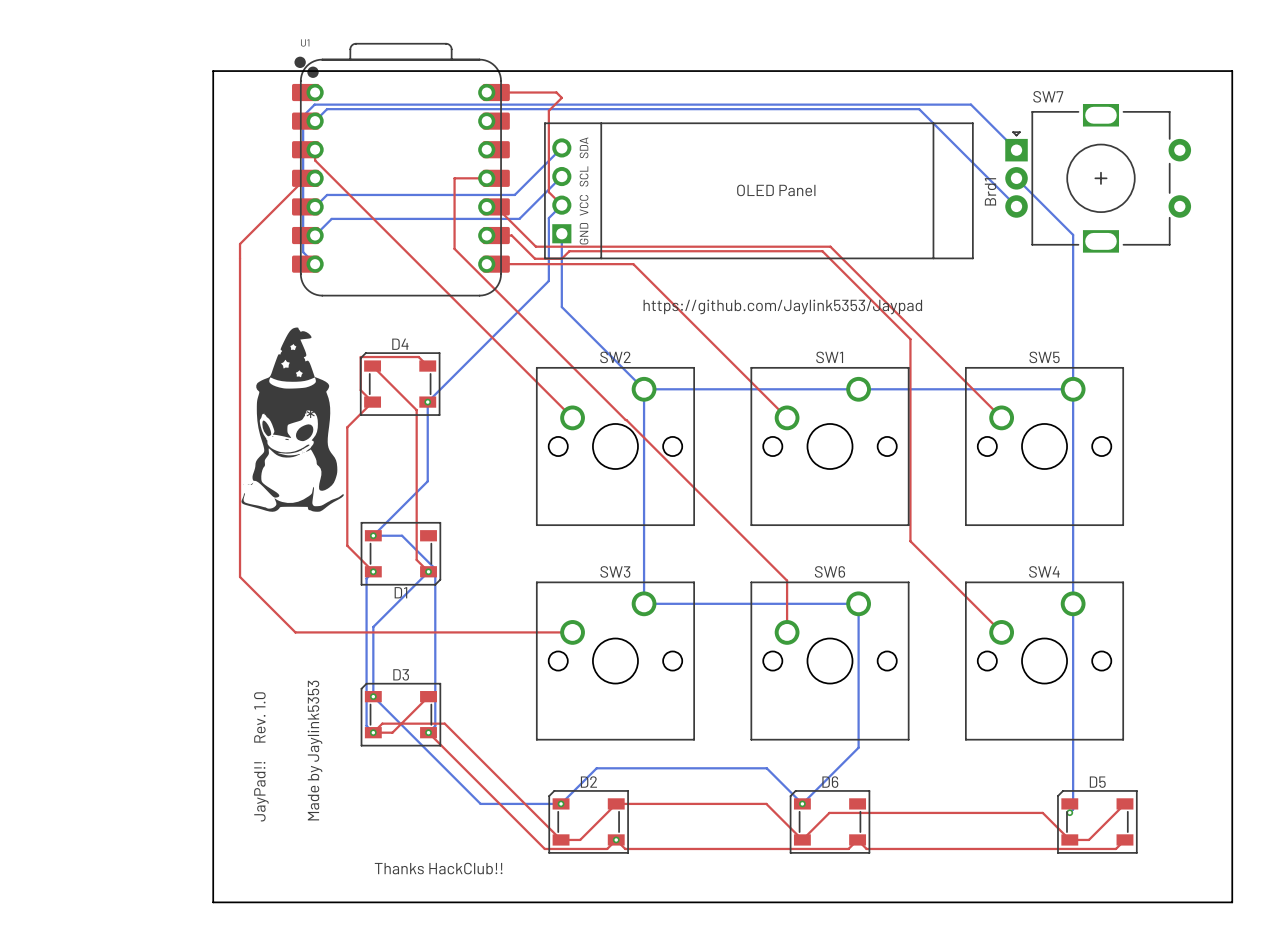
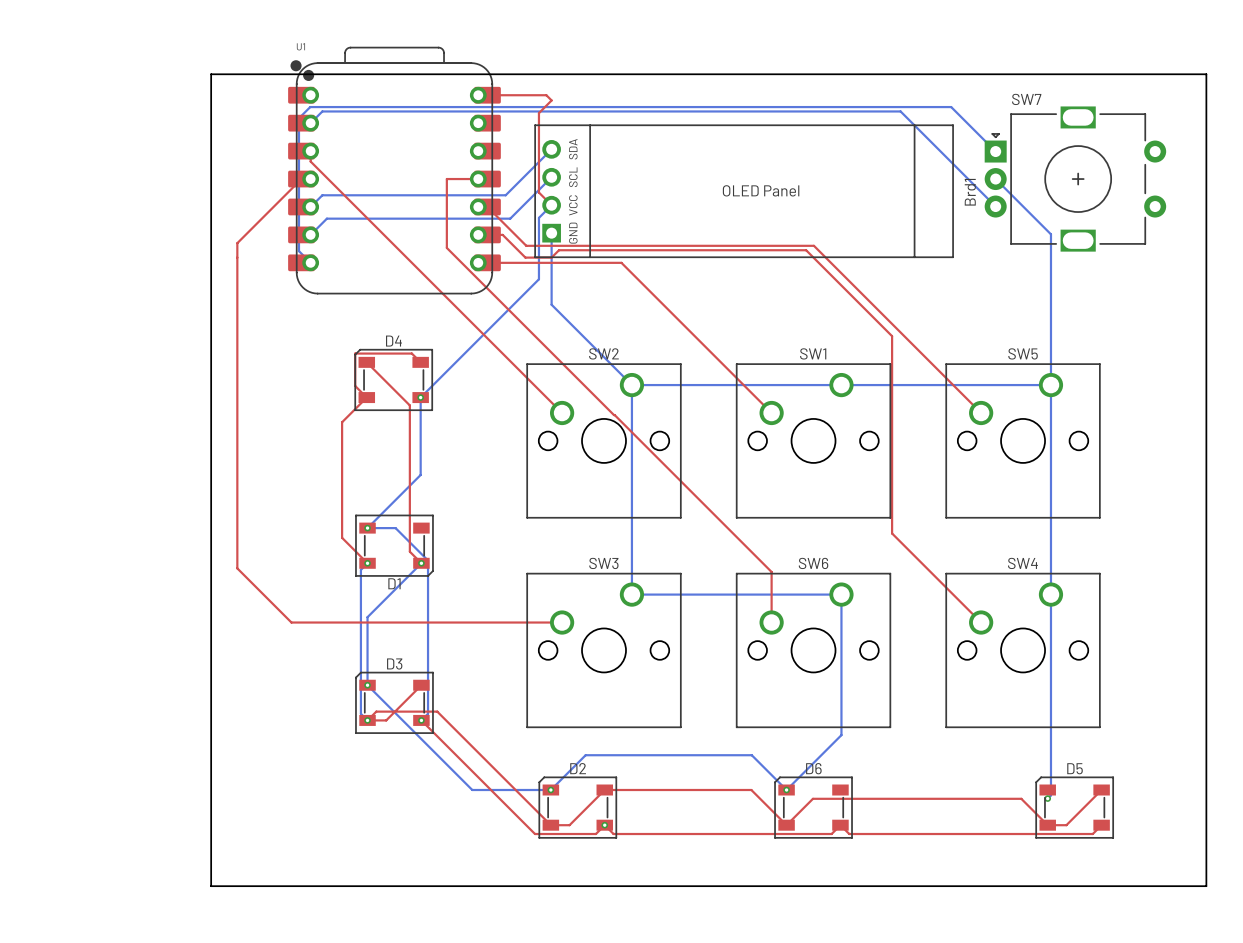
text: https://github.com/Jaylink5353/Jaypad (782, 306) -> none
part: (292, 419) -> none
text: Made by Jaylink5353 (314, 750) -> none
text: JayPad!! Rev. 1.0 (261, 756) -> none
text: Thanks HackClub!! (438, 868) -> none

